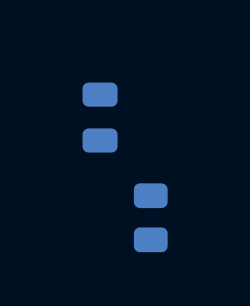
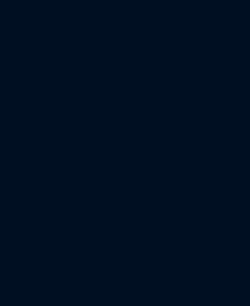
part: (100, 117) -> none
part: (150, 217) -> none

